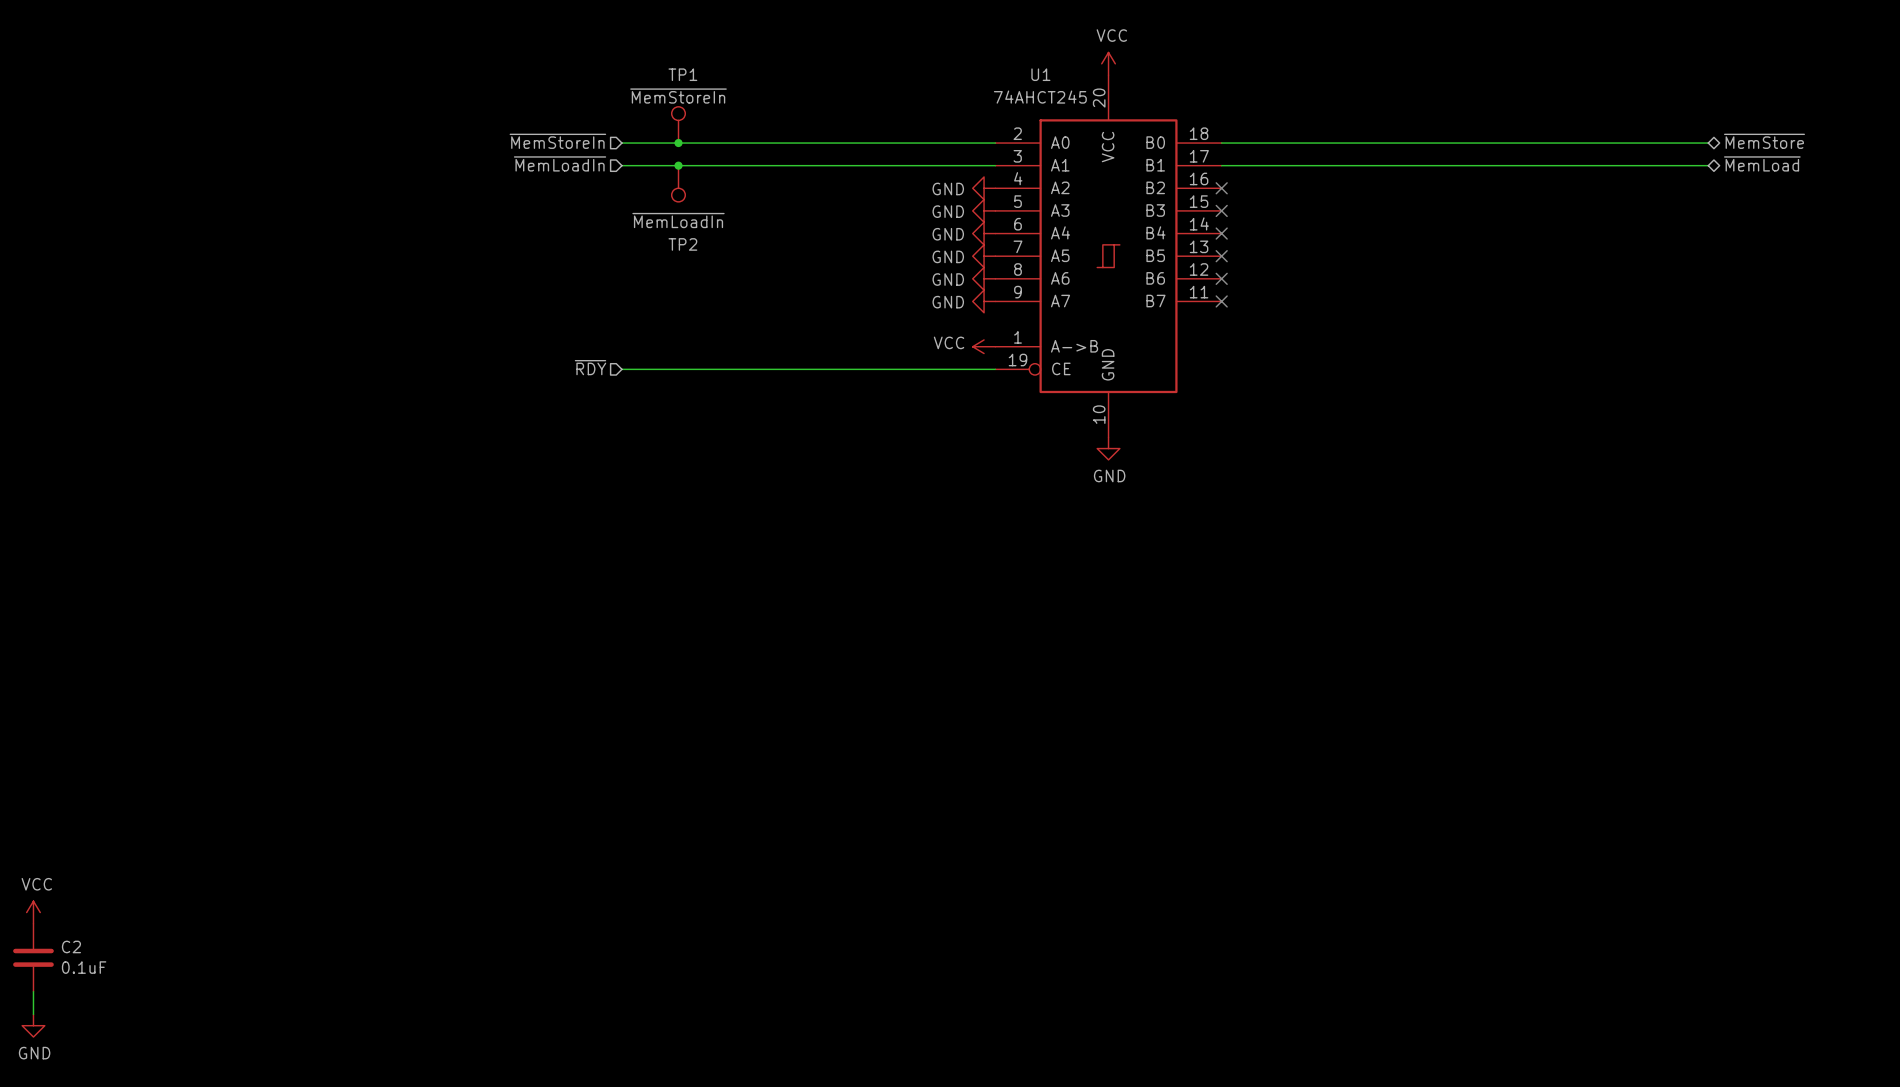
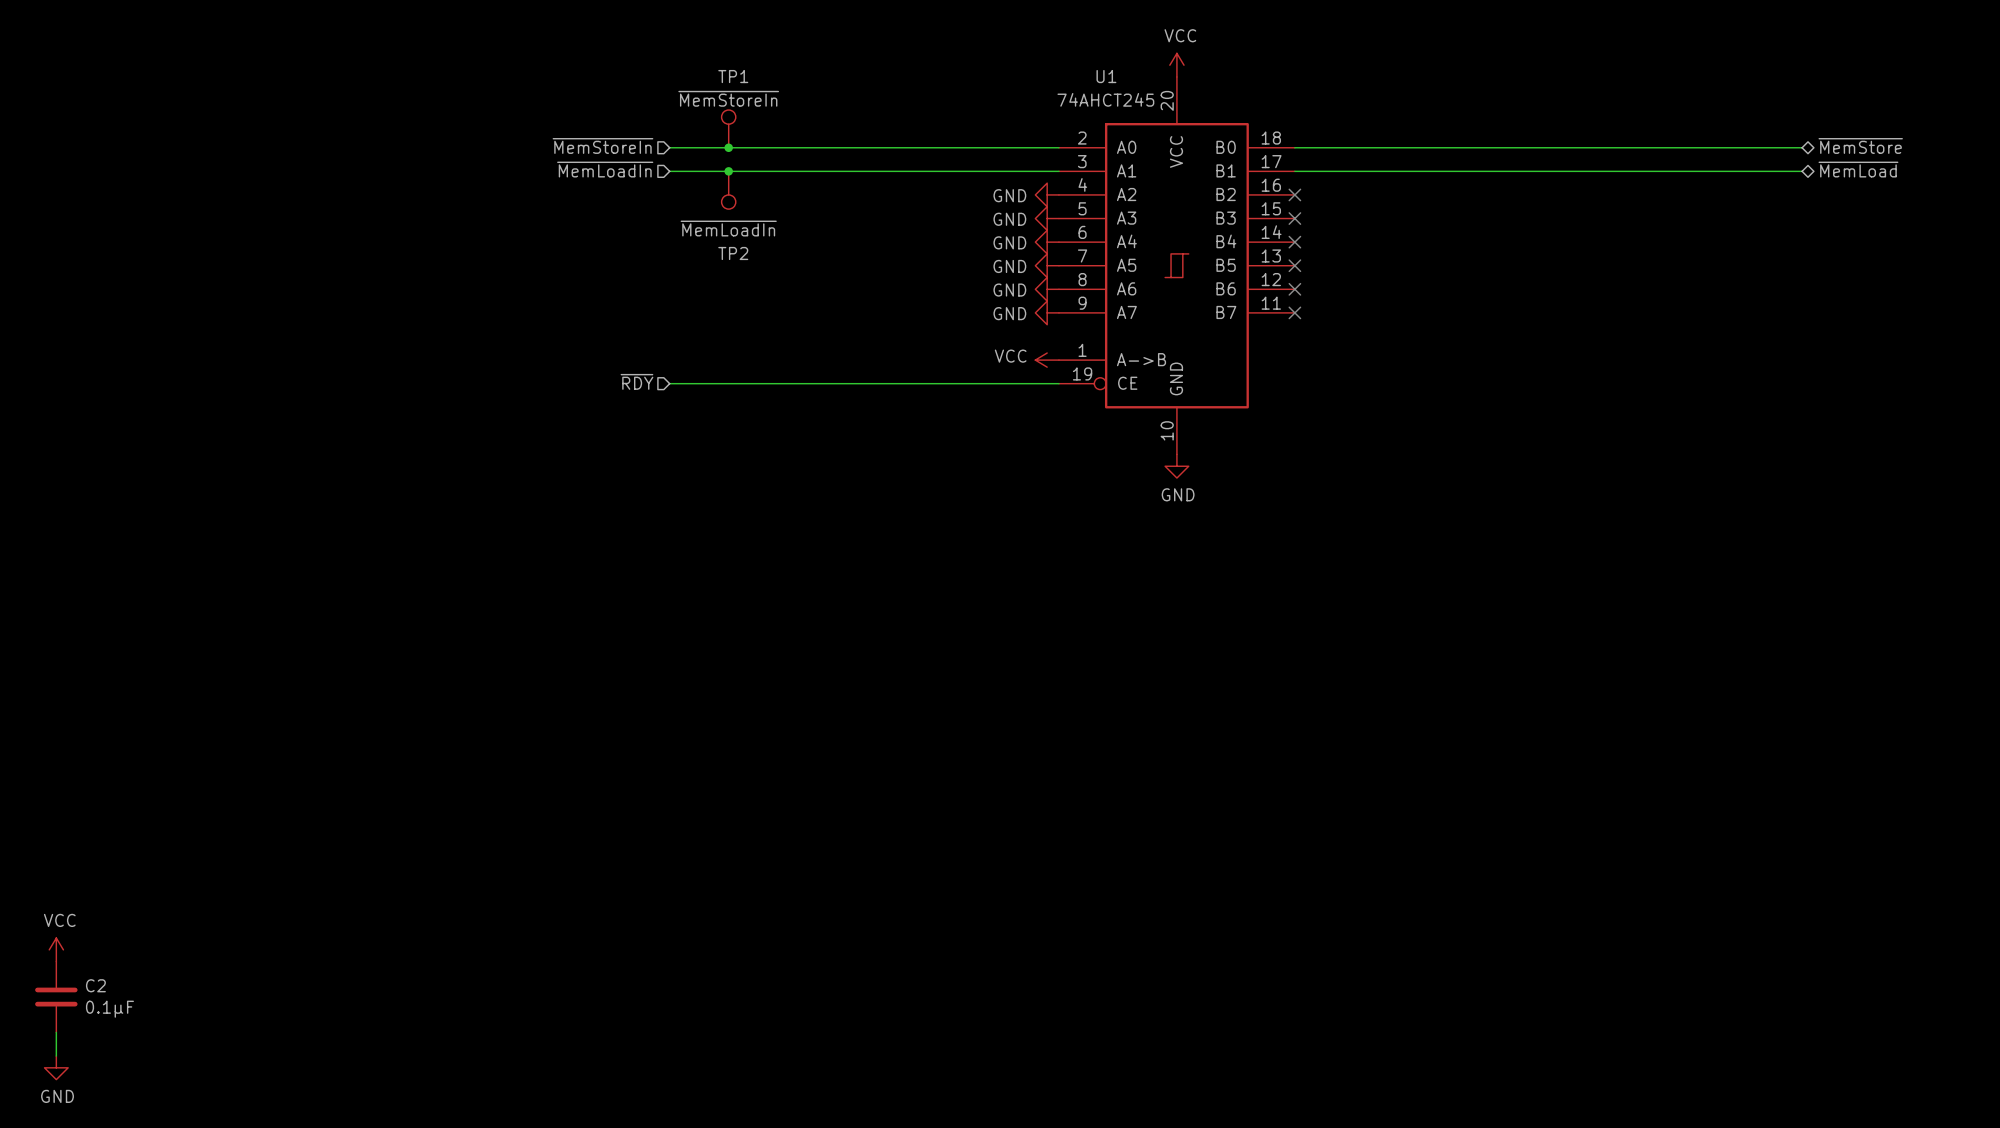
C2 value: 0.1uF (84, 967) -> 0.1μF (109, 1009)

